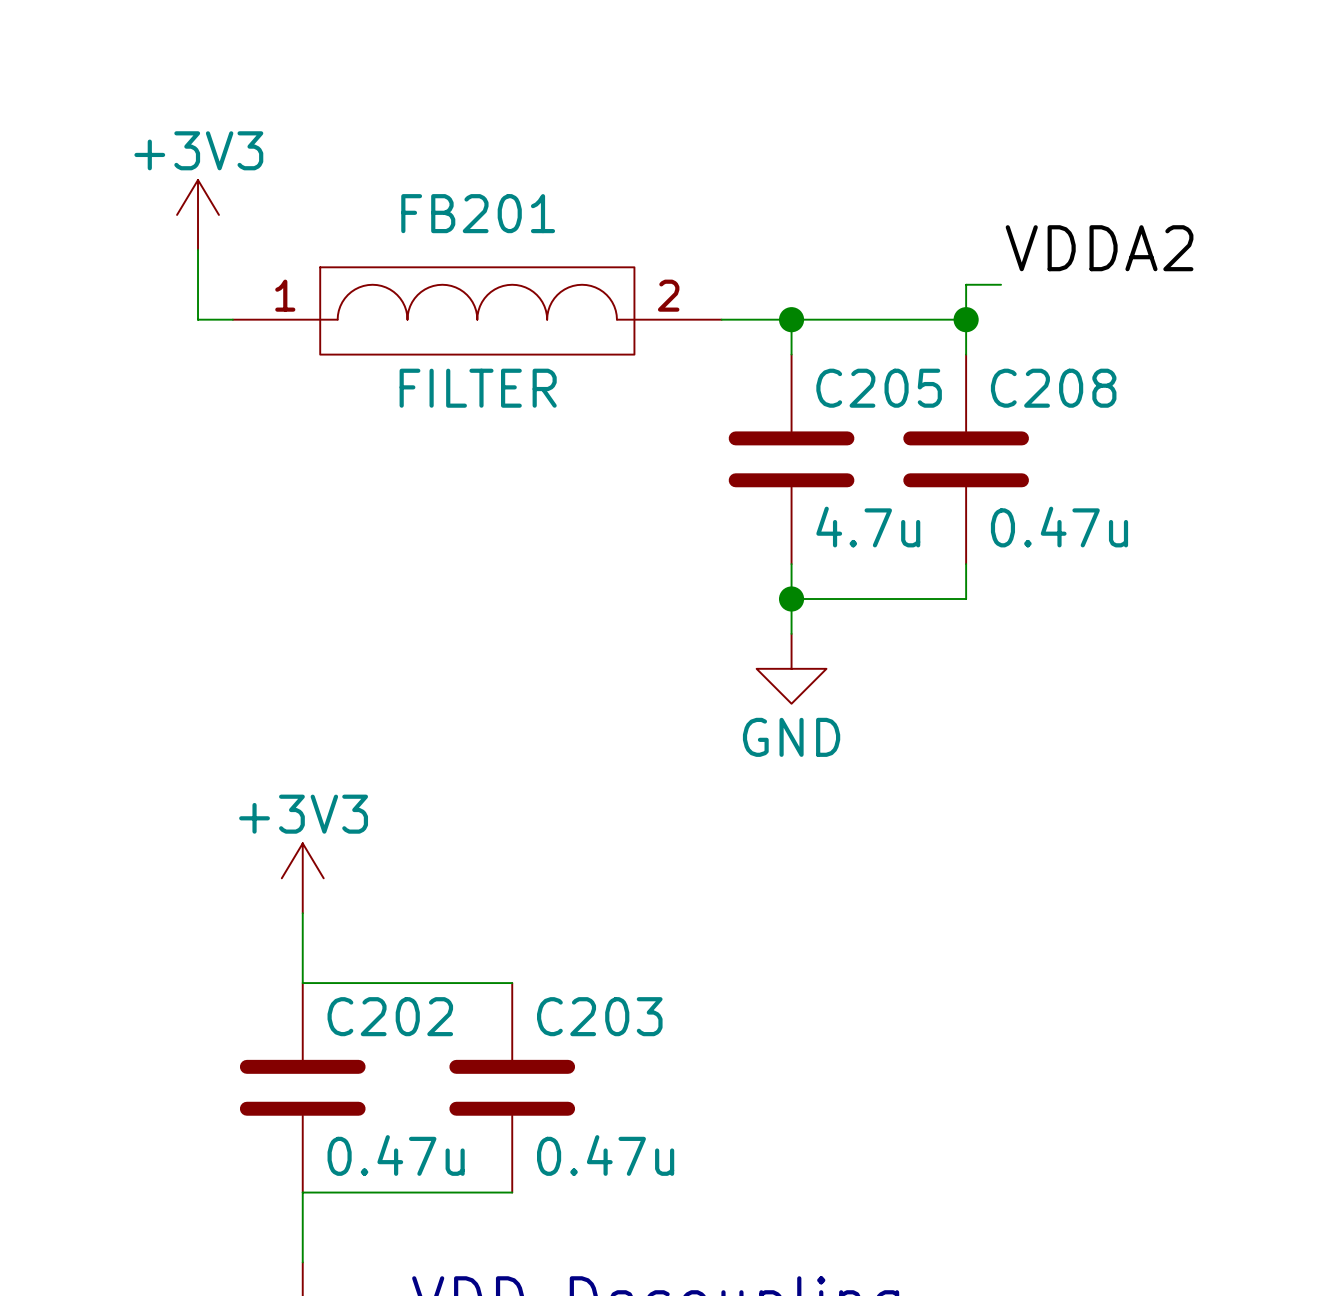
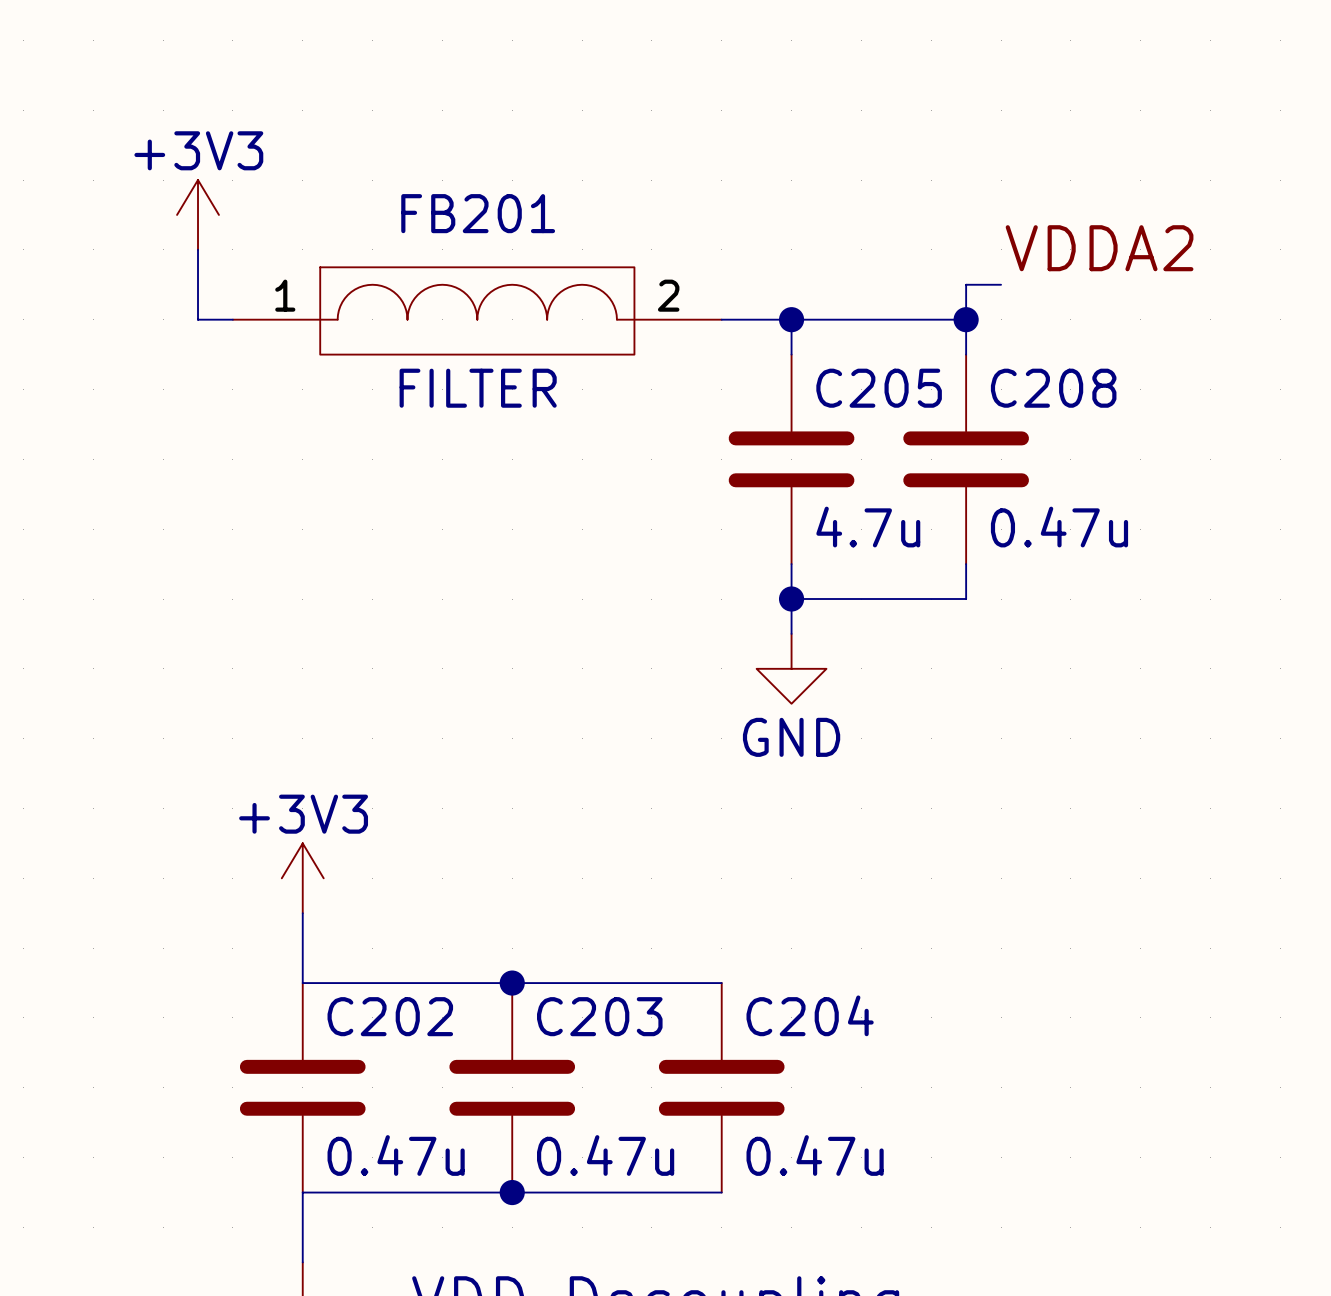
wire: none -> (512, 983) (721, 983)
junction: none -> (512, 983)
C204: none -> 0.47u (721, 1087)
wire: none -> (512, 1192) (721, 1192)
junction: none -> (512, 1192)

